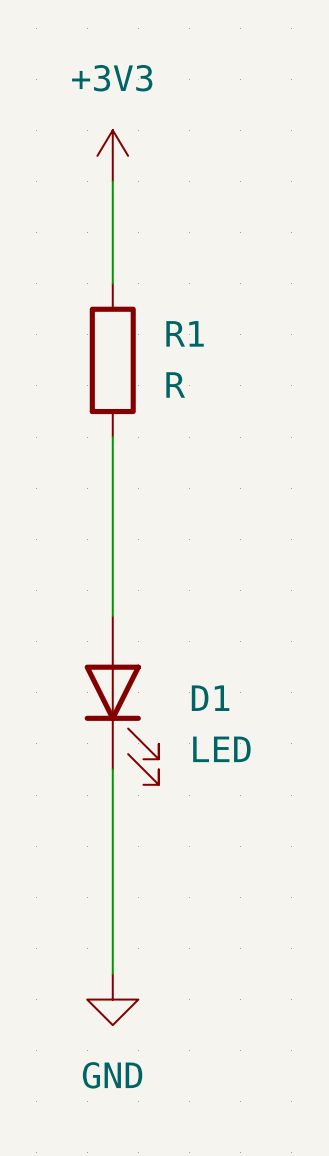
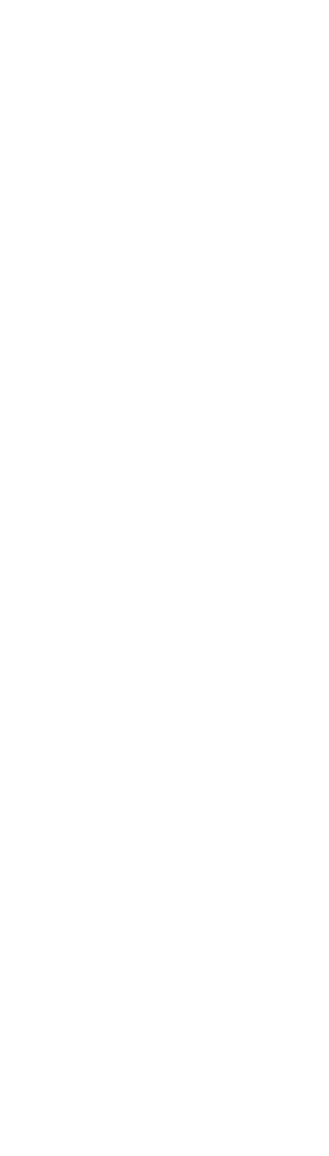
power symbol: +3V3 (112, 155) -> none
wire: (112, 181) (112, 283) -> none
R1: R (112, 360) -> none
wire: (112, 437) (112, 616) -> none
D1: LED (121, 700) -> none
wire: (112, 769) (112, 974) -> none
power symbol: GND (112, 999) -> none

